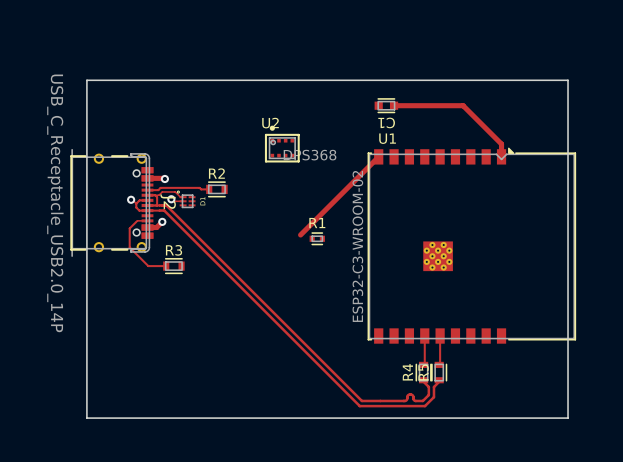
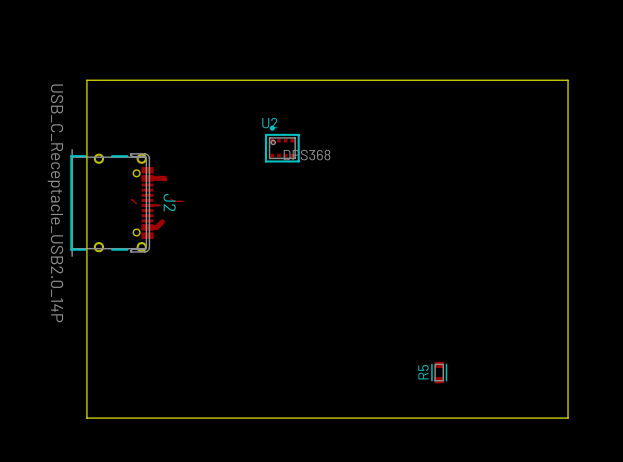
C1: (386, 105) -> none
track: (394, 105) (463, 105) (501, 144) (501, 156) (501, 152) -> none
track: (378, 156) (300, 234) -> none
via: (164, 178) -> none
track: (209, 189) (160, 187) (158, 190) (147, 190) -> none
R2: (216, 189) -> none
track: (183, 197) (175, 191) (162, 191) (159, 195) (147, 195) (155, 195) (157, 197) (157, 205) -> none
via: (131, 199) -> none
via: (171, 199) -> none
part: (186, 199) -> none
track: (147, 200) (139, 200) (136, 203) (136, 207) (139, 210) (159, 210) -> none
track: (159, 205) (166, 205) (361, 400) (405, 400) (409, 394) (412, 395) (414, 400) (422, 400) (428, 395) (428, 387) (423, 380) -> none
track: (159, 210) (164, 210) (359, 406) (425, 406) (433, 397) (433, 387) (439, 380) -> none
track: (147, 220) (137, 220) (129, 228) (129, 247) (148, 266) (166, 266) -> none
via: (162, 221) -> none
R1: (317, 238) -> none
U1: ESP32-C3-WROOM-02 (471, 245) -> none
R3: (173, 266) -> none
track: (424, 336) (423, 364) -> none
track: (440, 336) (439, 364) -> none
R4: (423, 372) -> none

